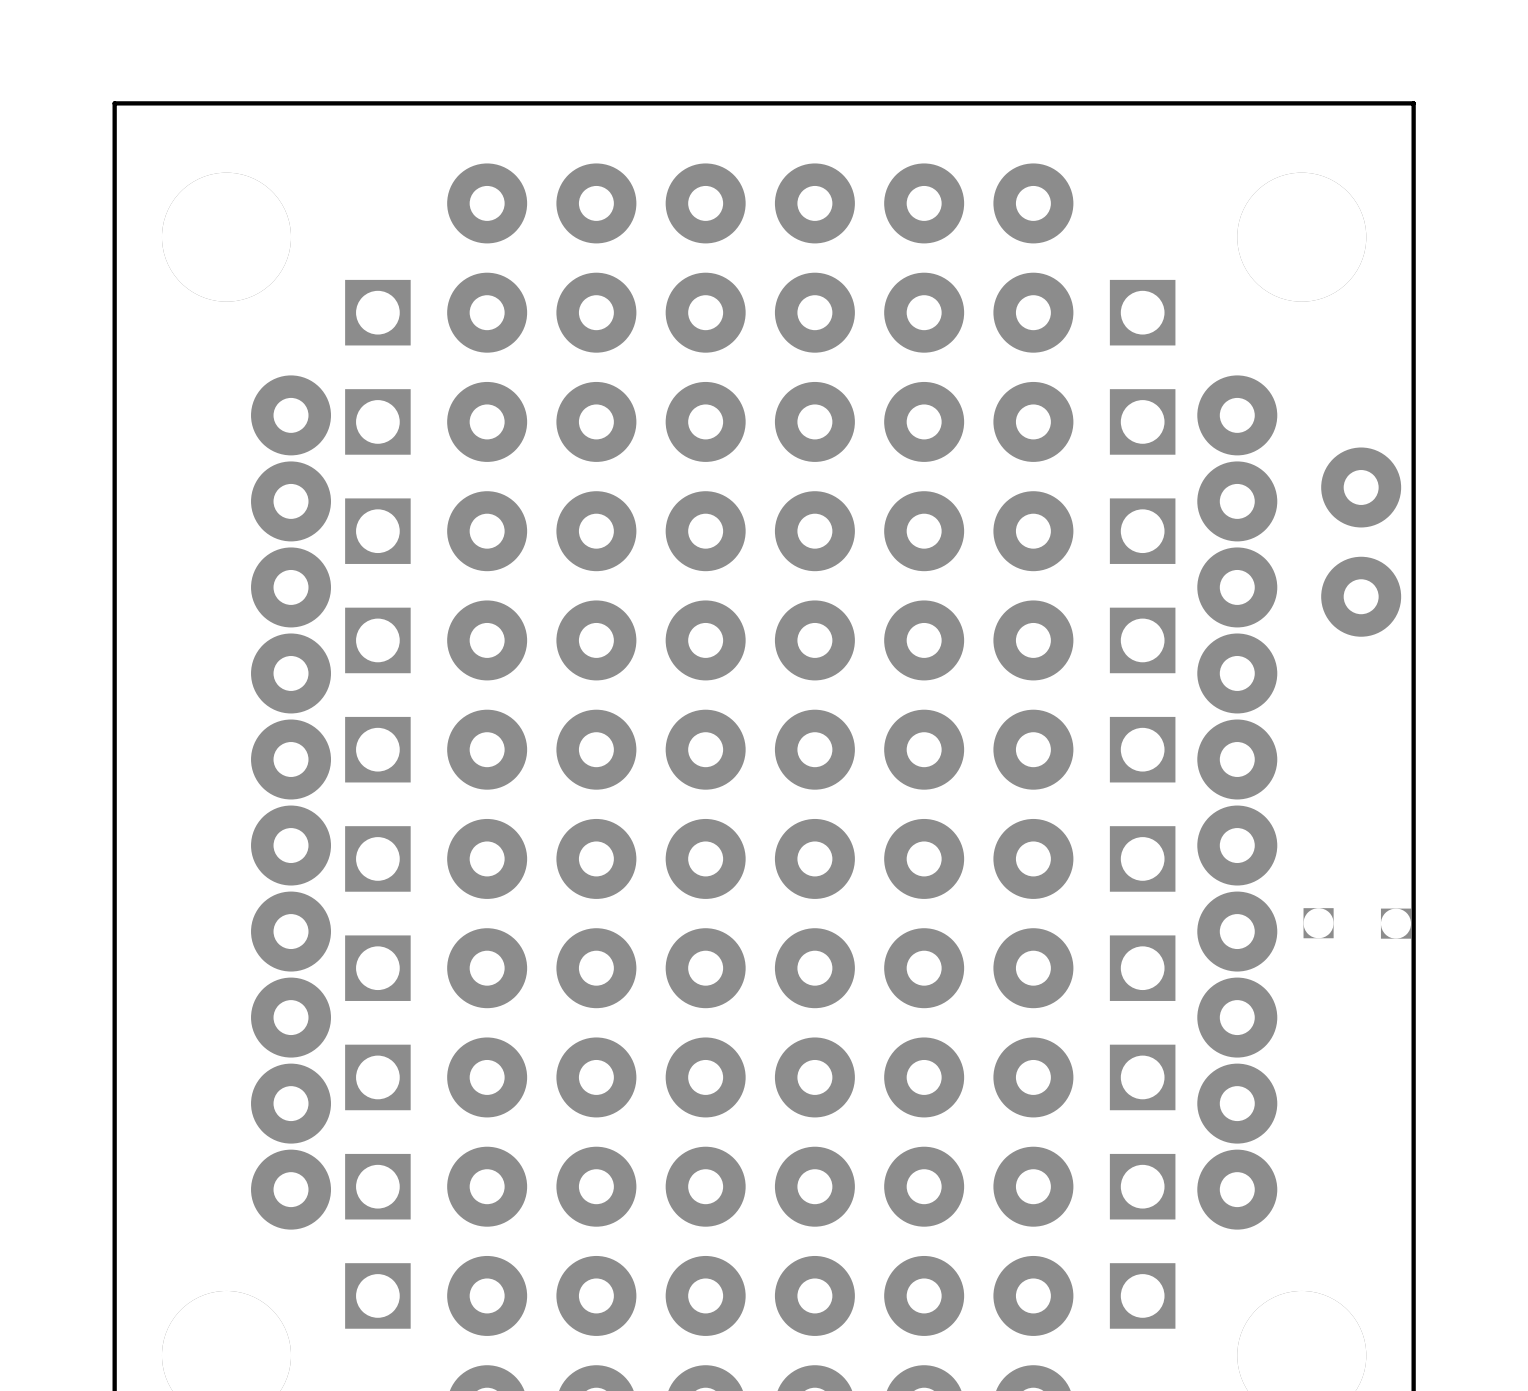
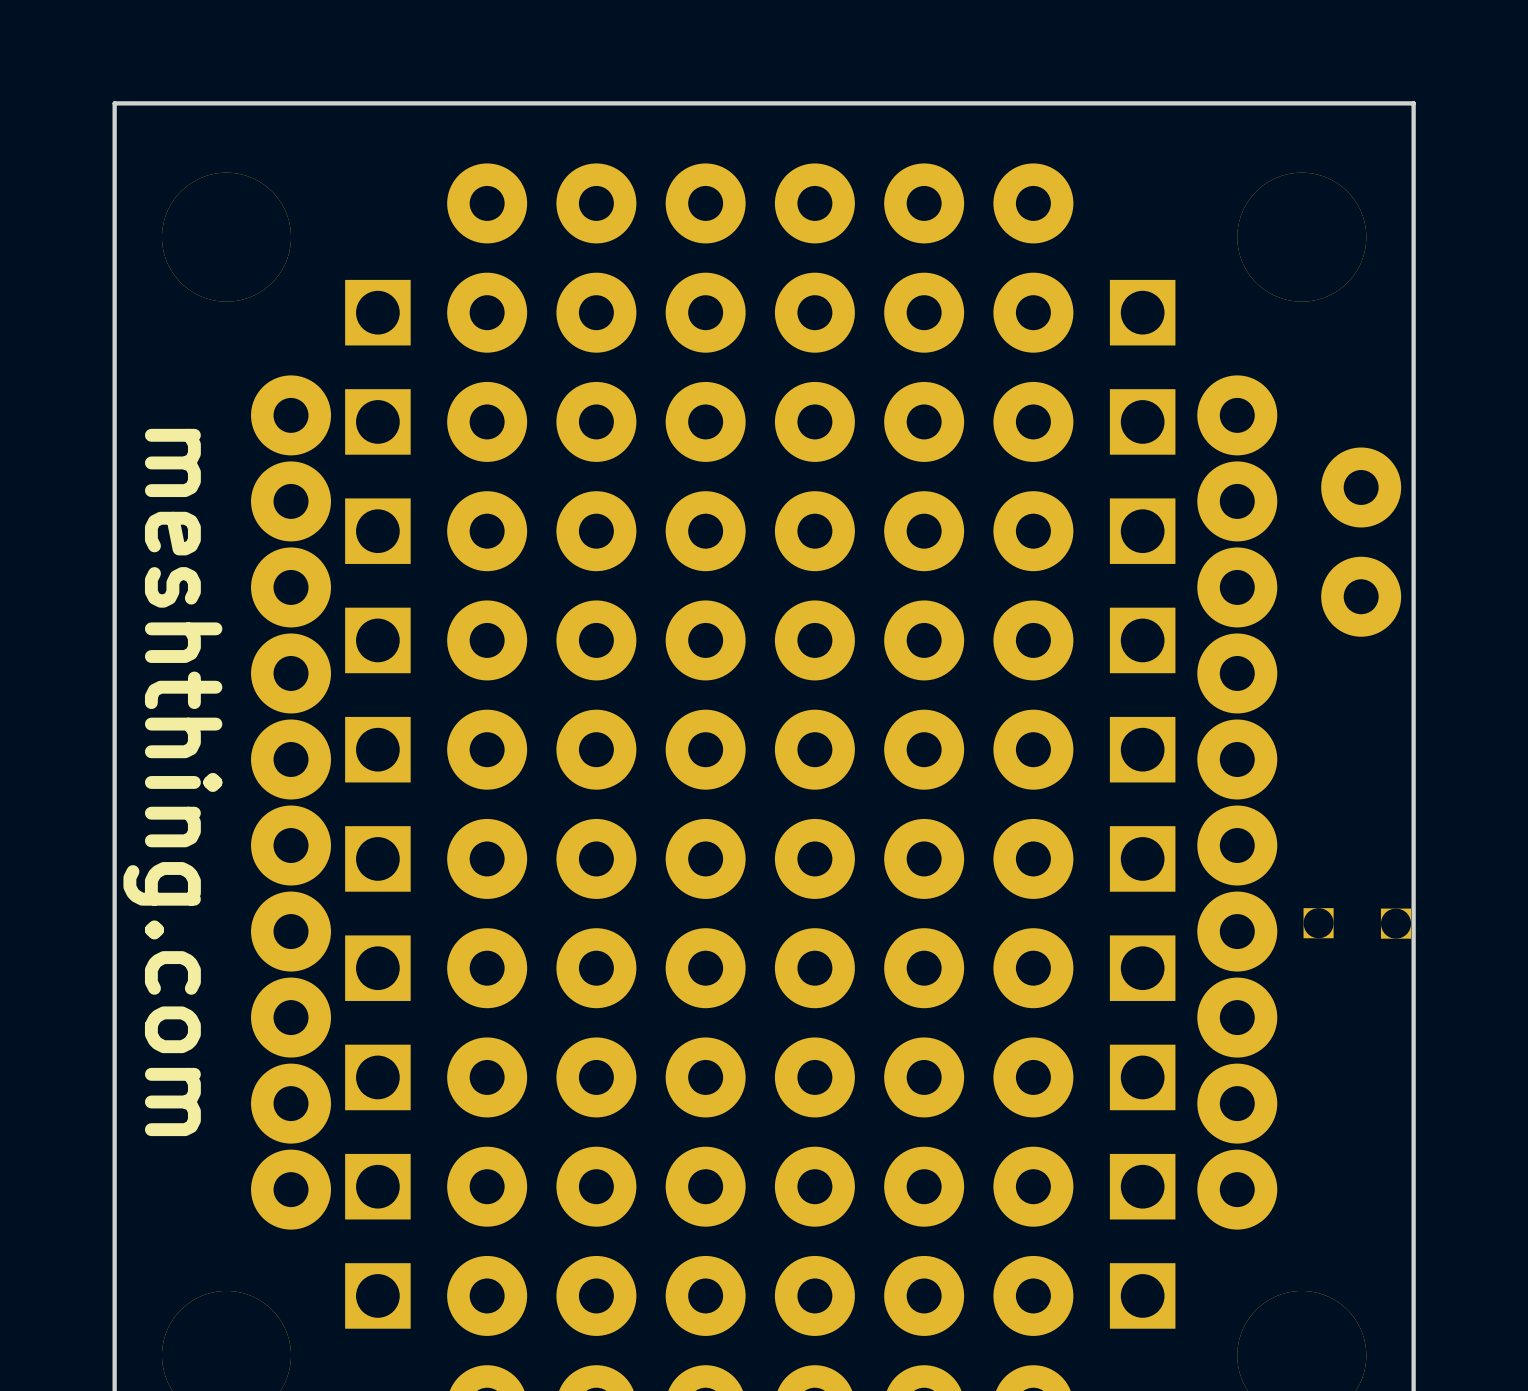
text: none -> meshthing.com (172, 782)

